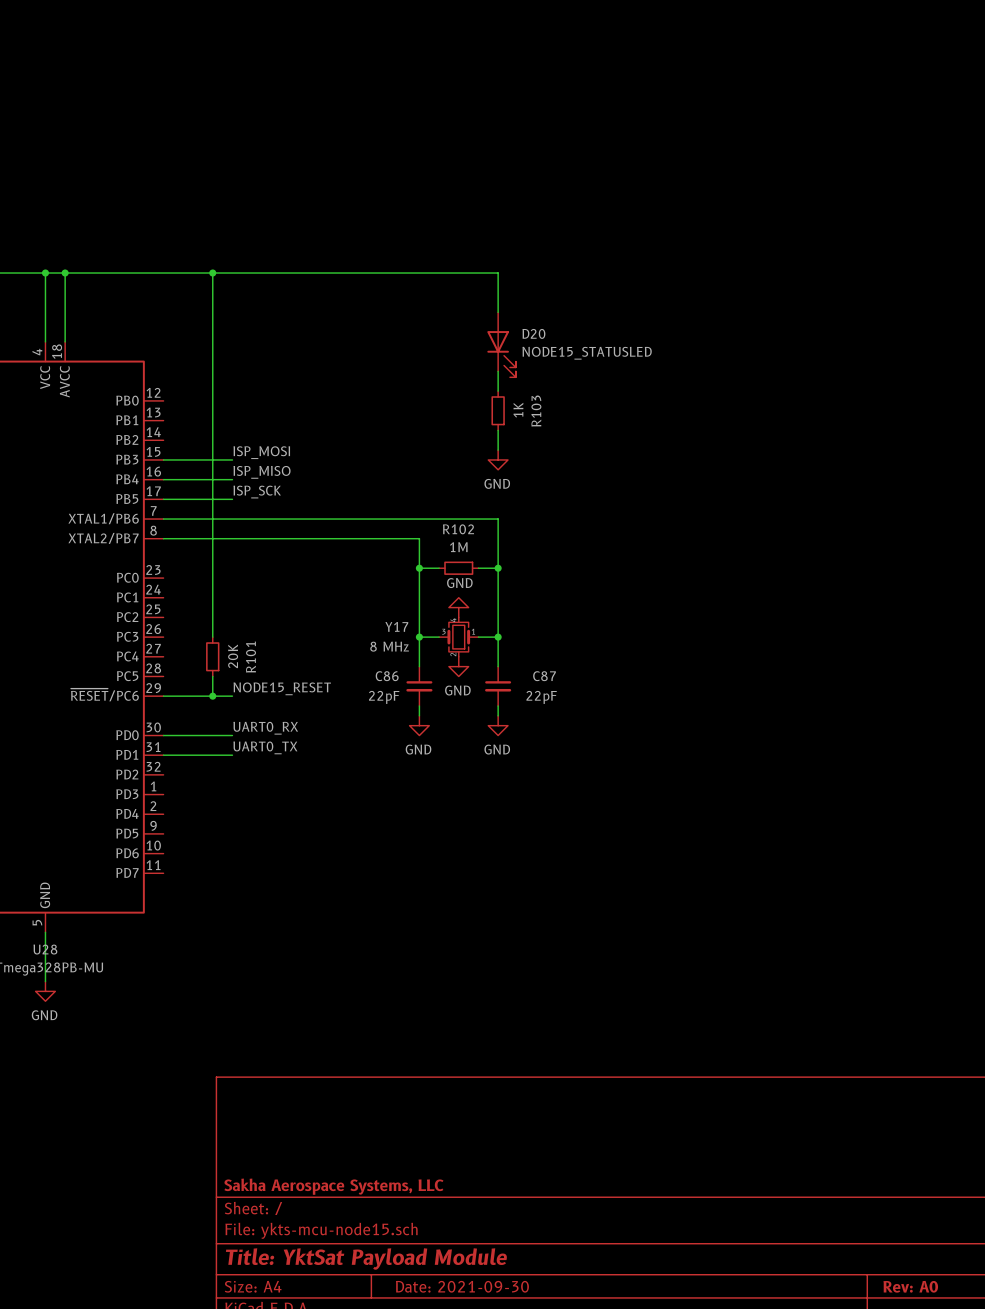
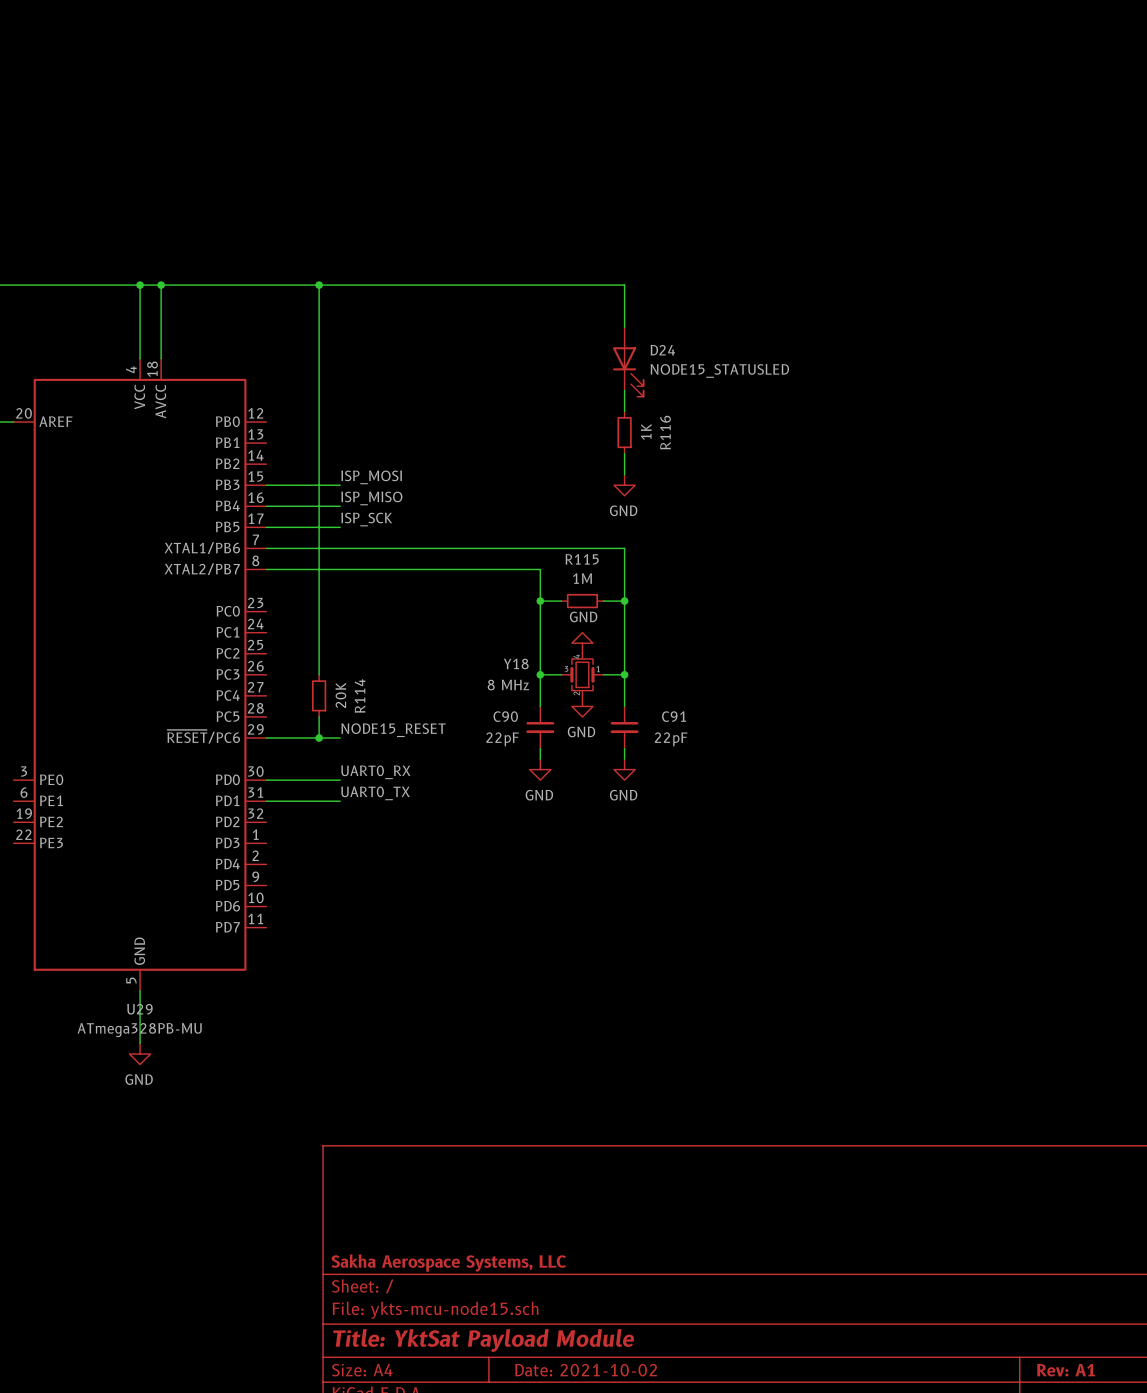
D20 name: D20 (533, 333) -> D24 (662, 350)
R103 name: R103 (536, 411) -> R116 (665, 432)
R102 name: R102 (458, 529) -> R115 (582, 559)
Y17 name: Y17 (396, 626) -> Y18 (516, 663)
R101 name: R101 (251, 657) -> R114 (360, 696)
C86 name: C86 (387, 676) -> C90 (505, 716)
C87 name: C87 (544, 676) -> C91 (674, 716)
U28 name: U28 (45, 949) -> U29 (139, 1009)
title block: Date: 2021-09-30 (462, 1286) -> Date: 2021-10-02 (586, 1370)
title block: Rev: A0 (910, 1286) -> Rev: A1 (1066, 1370)

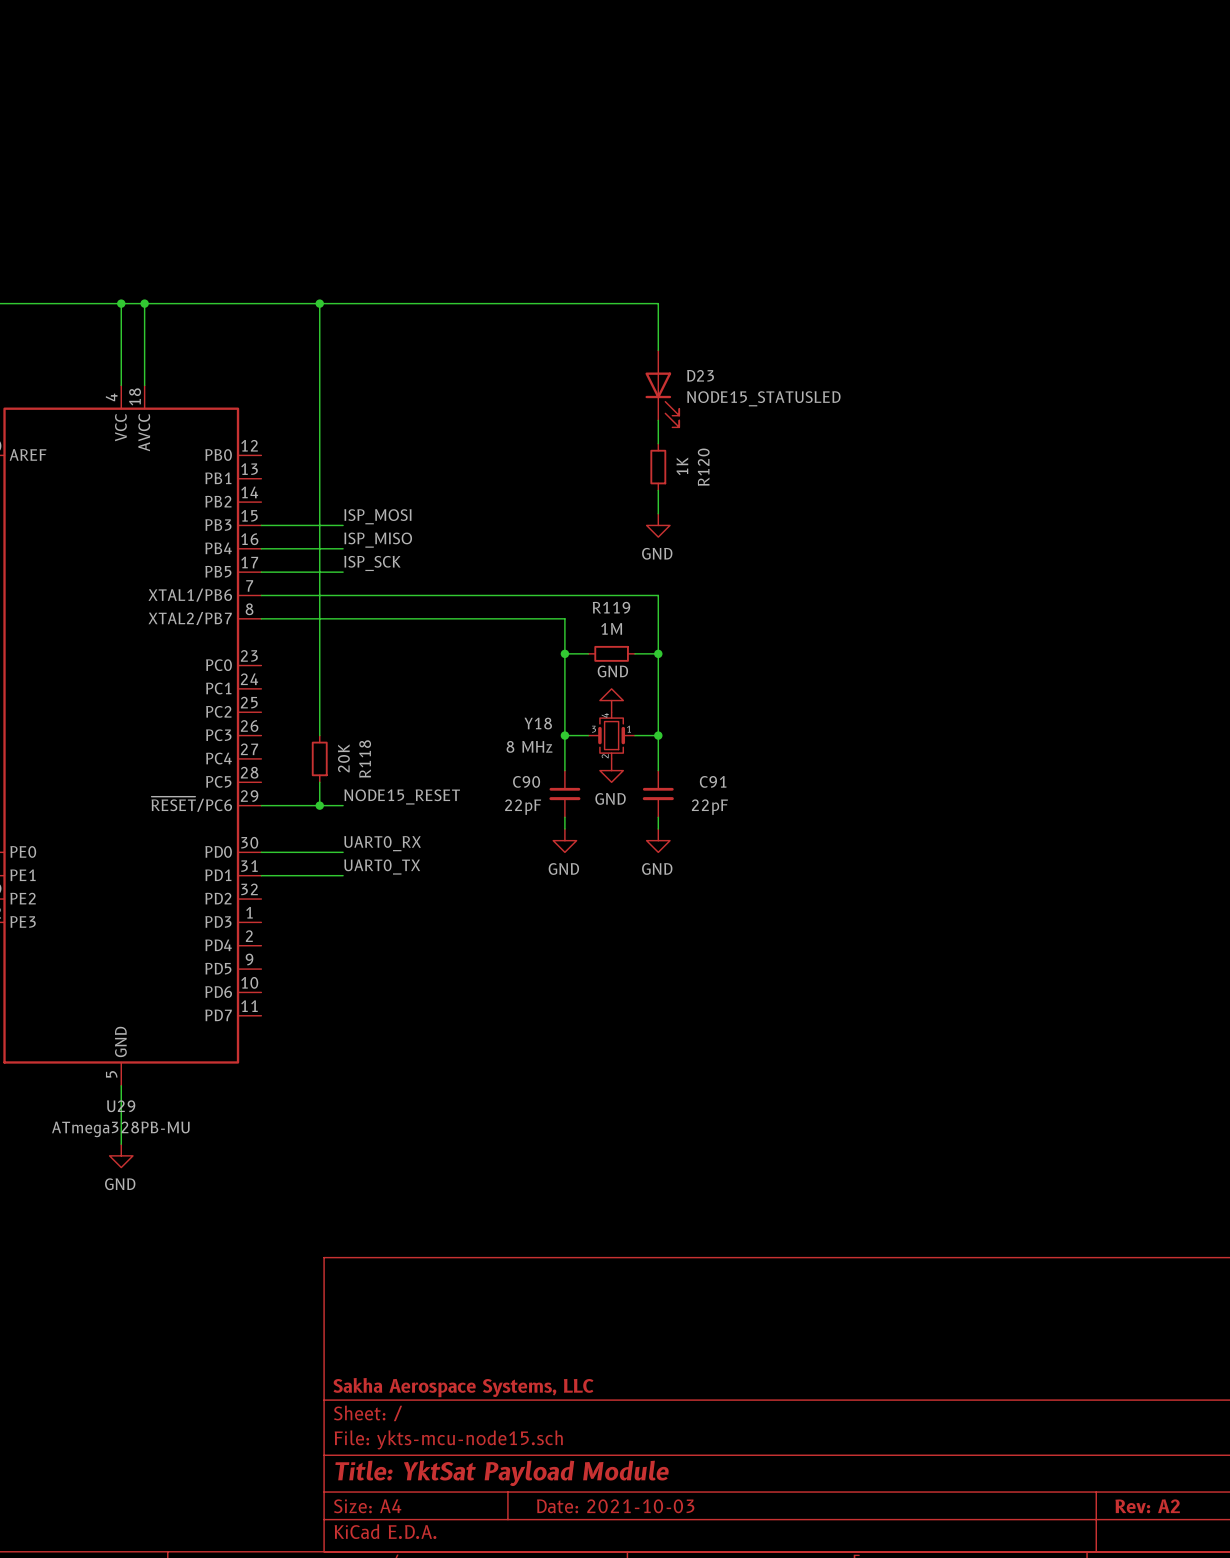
D24 name: D24 (662, 350) -> D23 (700, 375)
R116 name: R116 (665, 432) -> R120 (703, 467)
R115 name: R115 (582, 559) -> R119 (611, 607)
R114 name: R114 (360, 696) -> R118 (365, 758)
title block: Date: 2021-10-02 (586, 1370) -> Date: 2021-10-03 (615, 1506)
title block: Rev: A1 (1066, 1370) -> Rev: A2 (1147, 1506)

